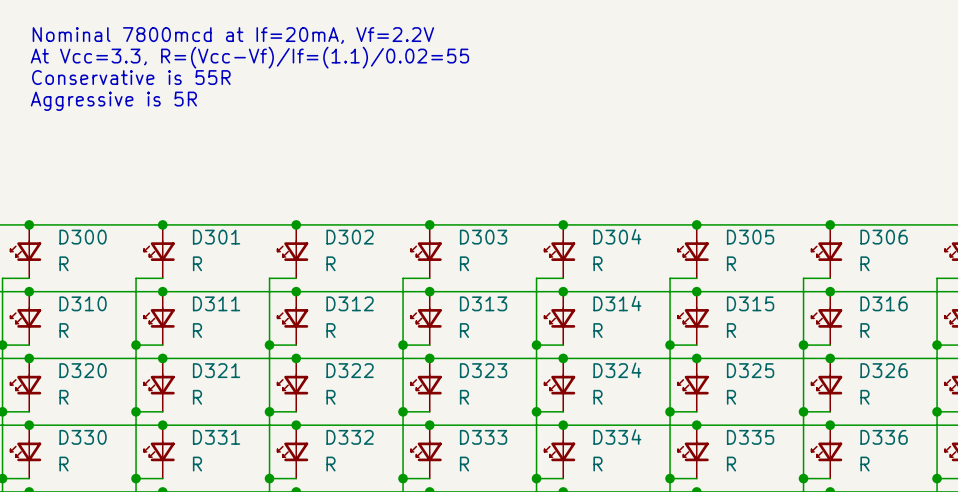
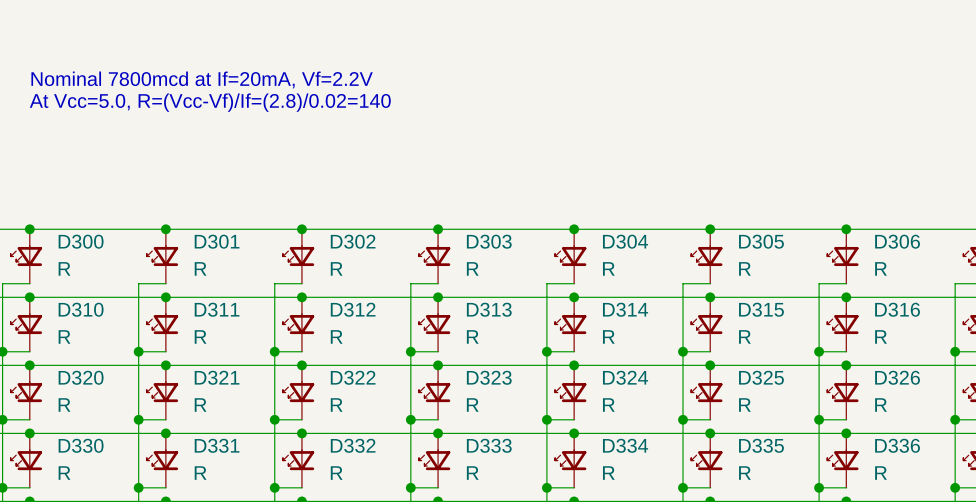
text: Nominal 7800mcd at If=20mA, Vf=2.2V (233, 35) -> none
text: At Vcc=3.3, R=(Vcc-Vf)/If=(1.1)/0.02=55 (249, 57) -> none
text: Conservative is 55R (131, 77) -> Nominal 7800mcd at If=20mA, Vf=2.2V (202, 79)
text: Aggressive is 5R (113, 101) -> At Vcc=5.0, R=(Vcc-Vf)/If=(2.8)/0.02=140 (210, 102)

